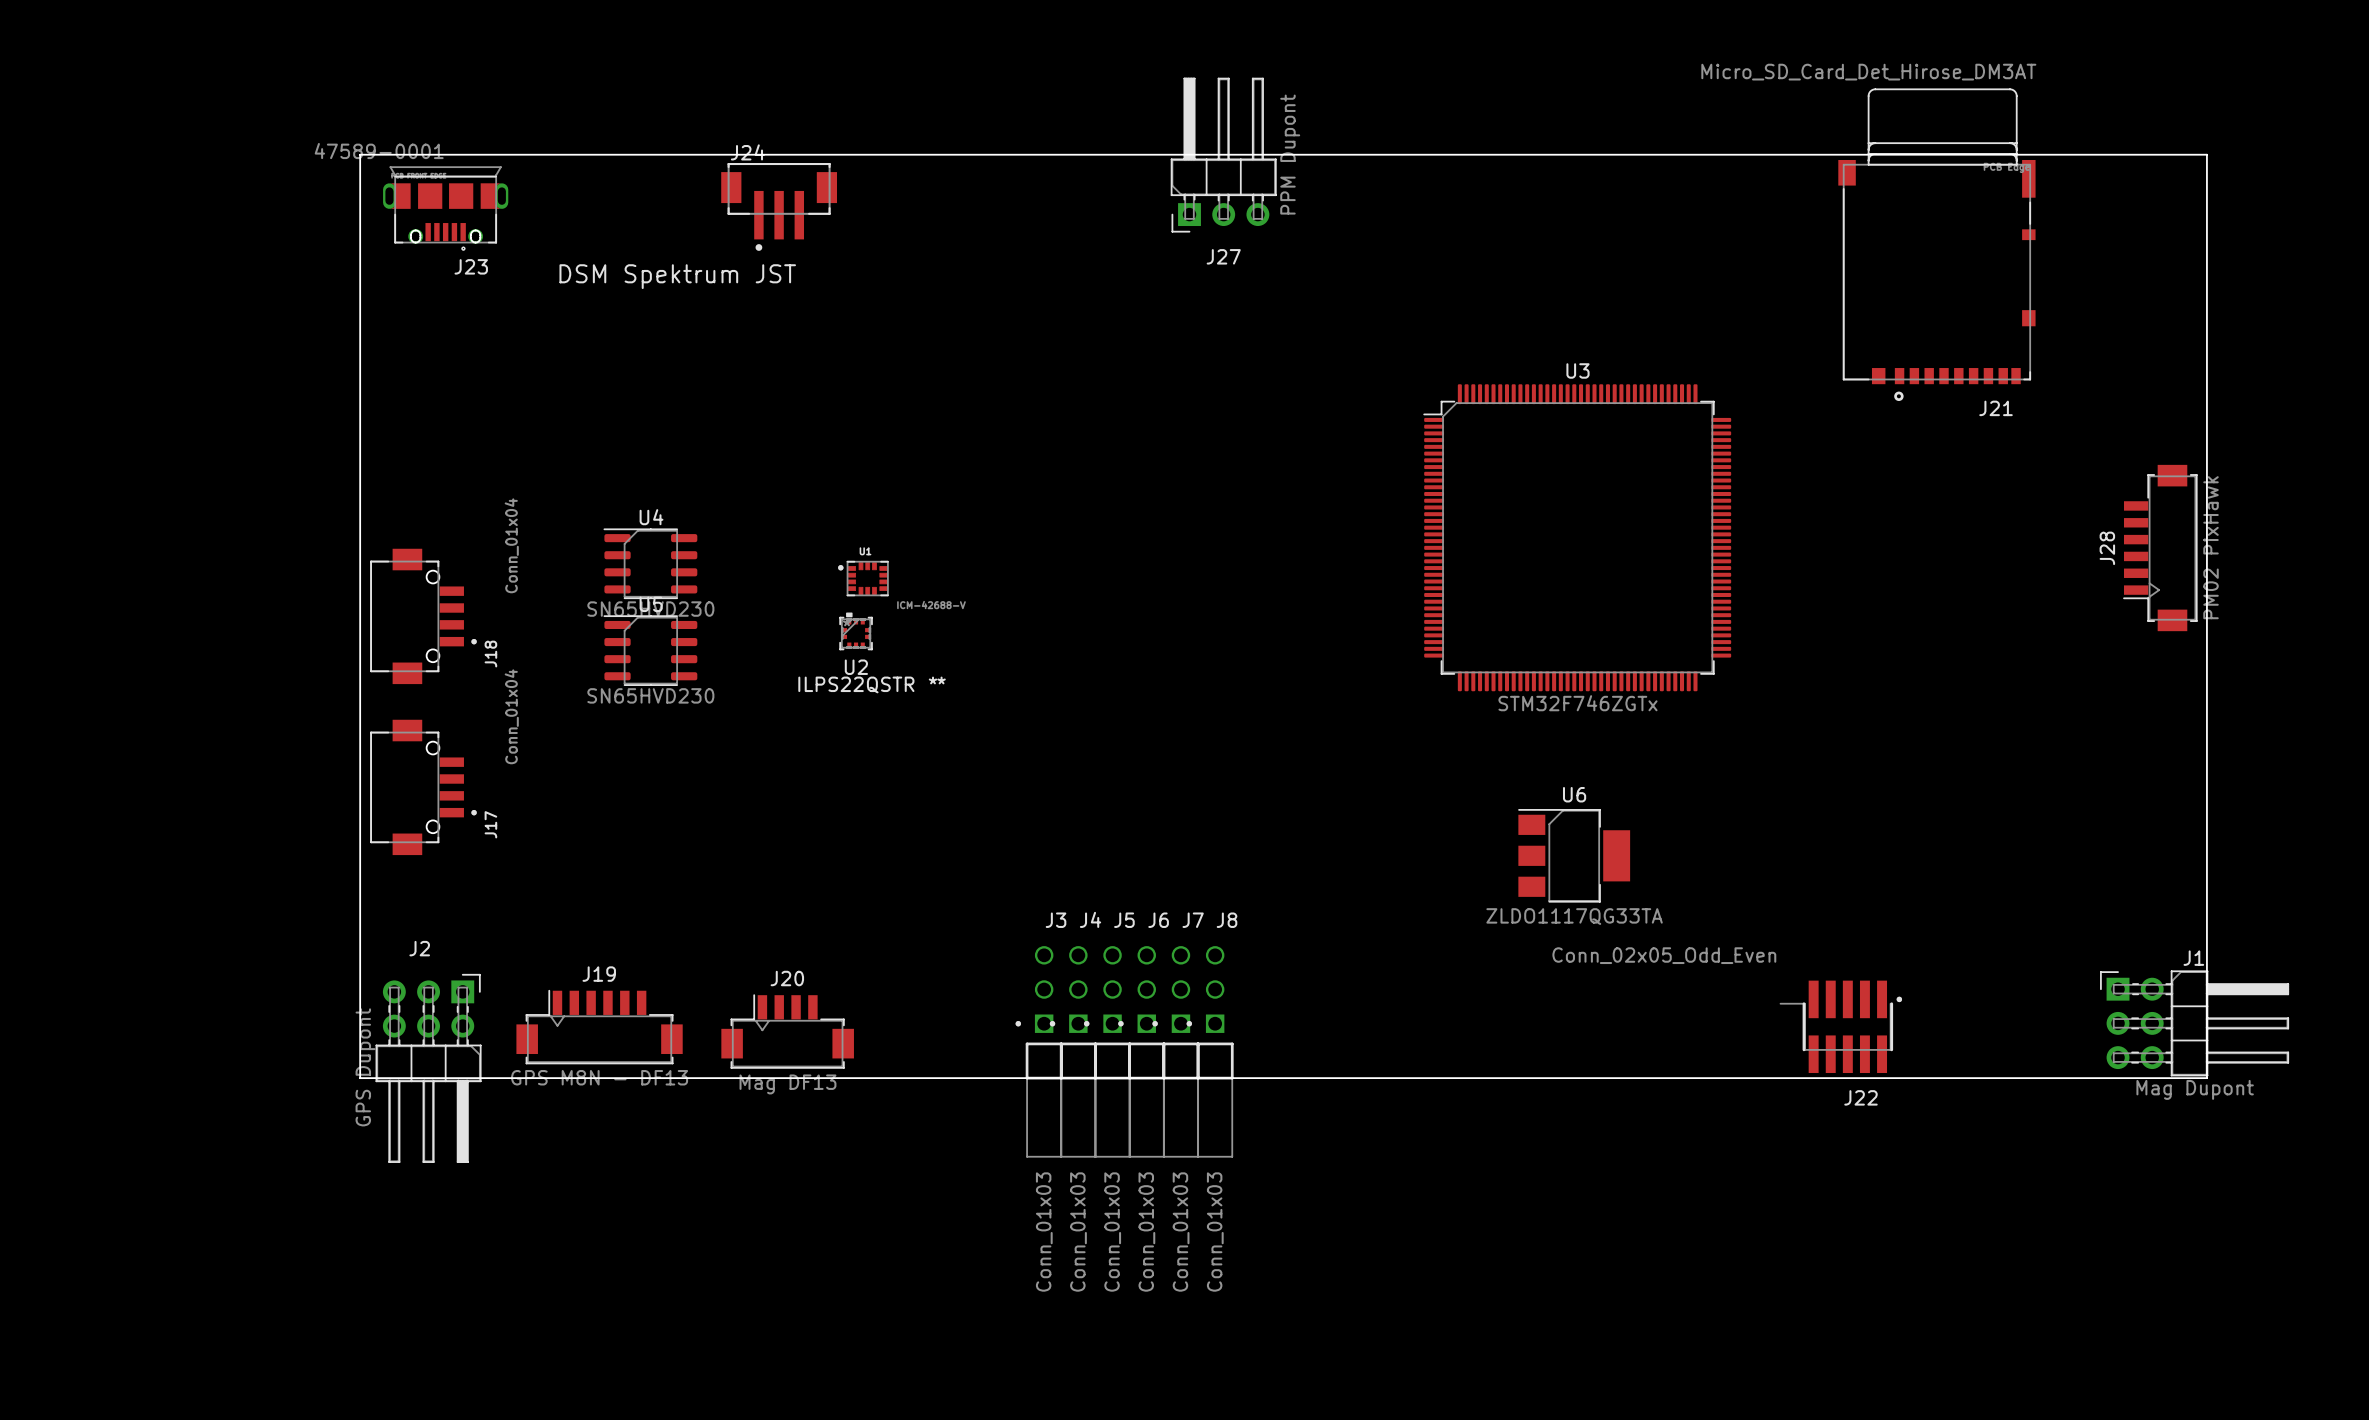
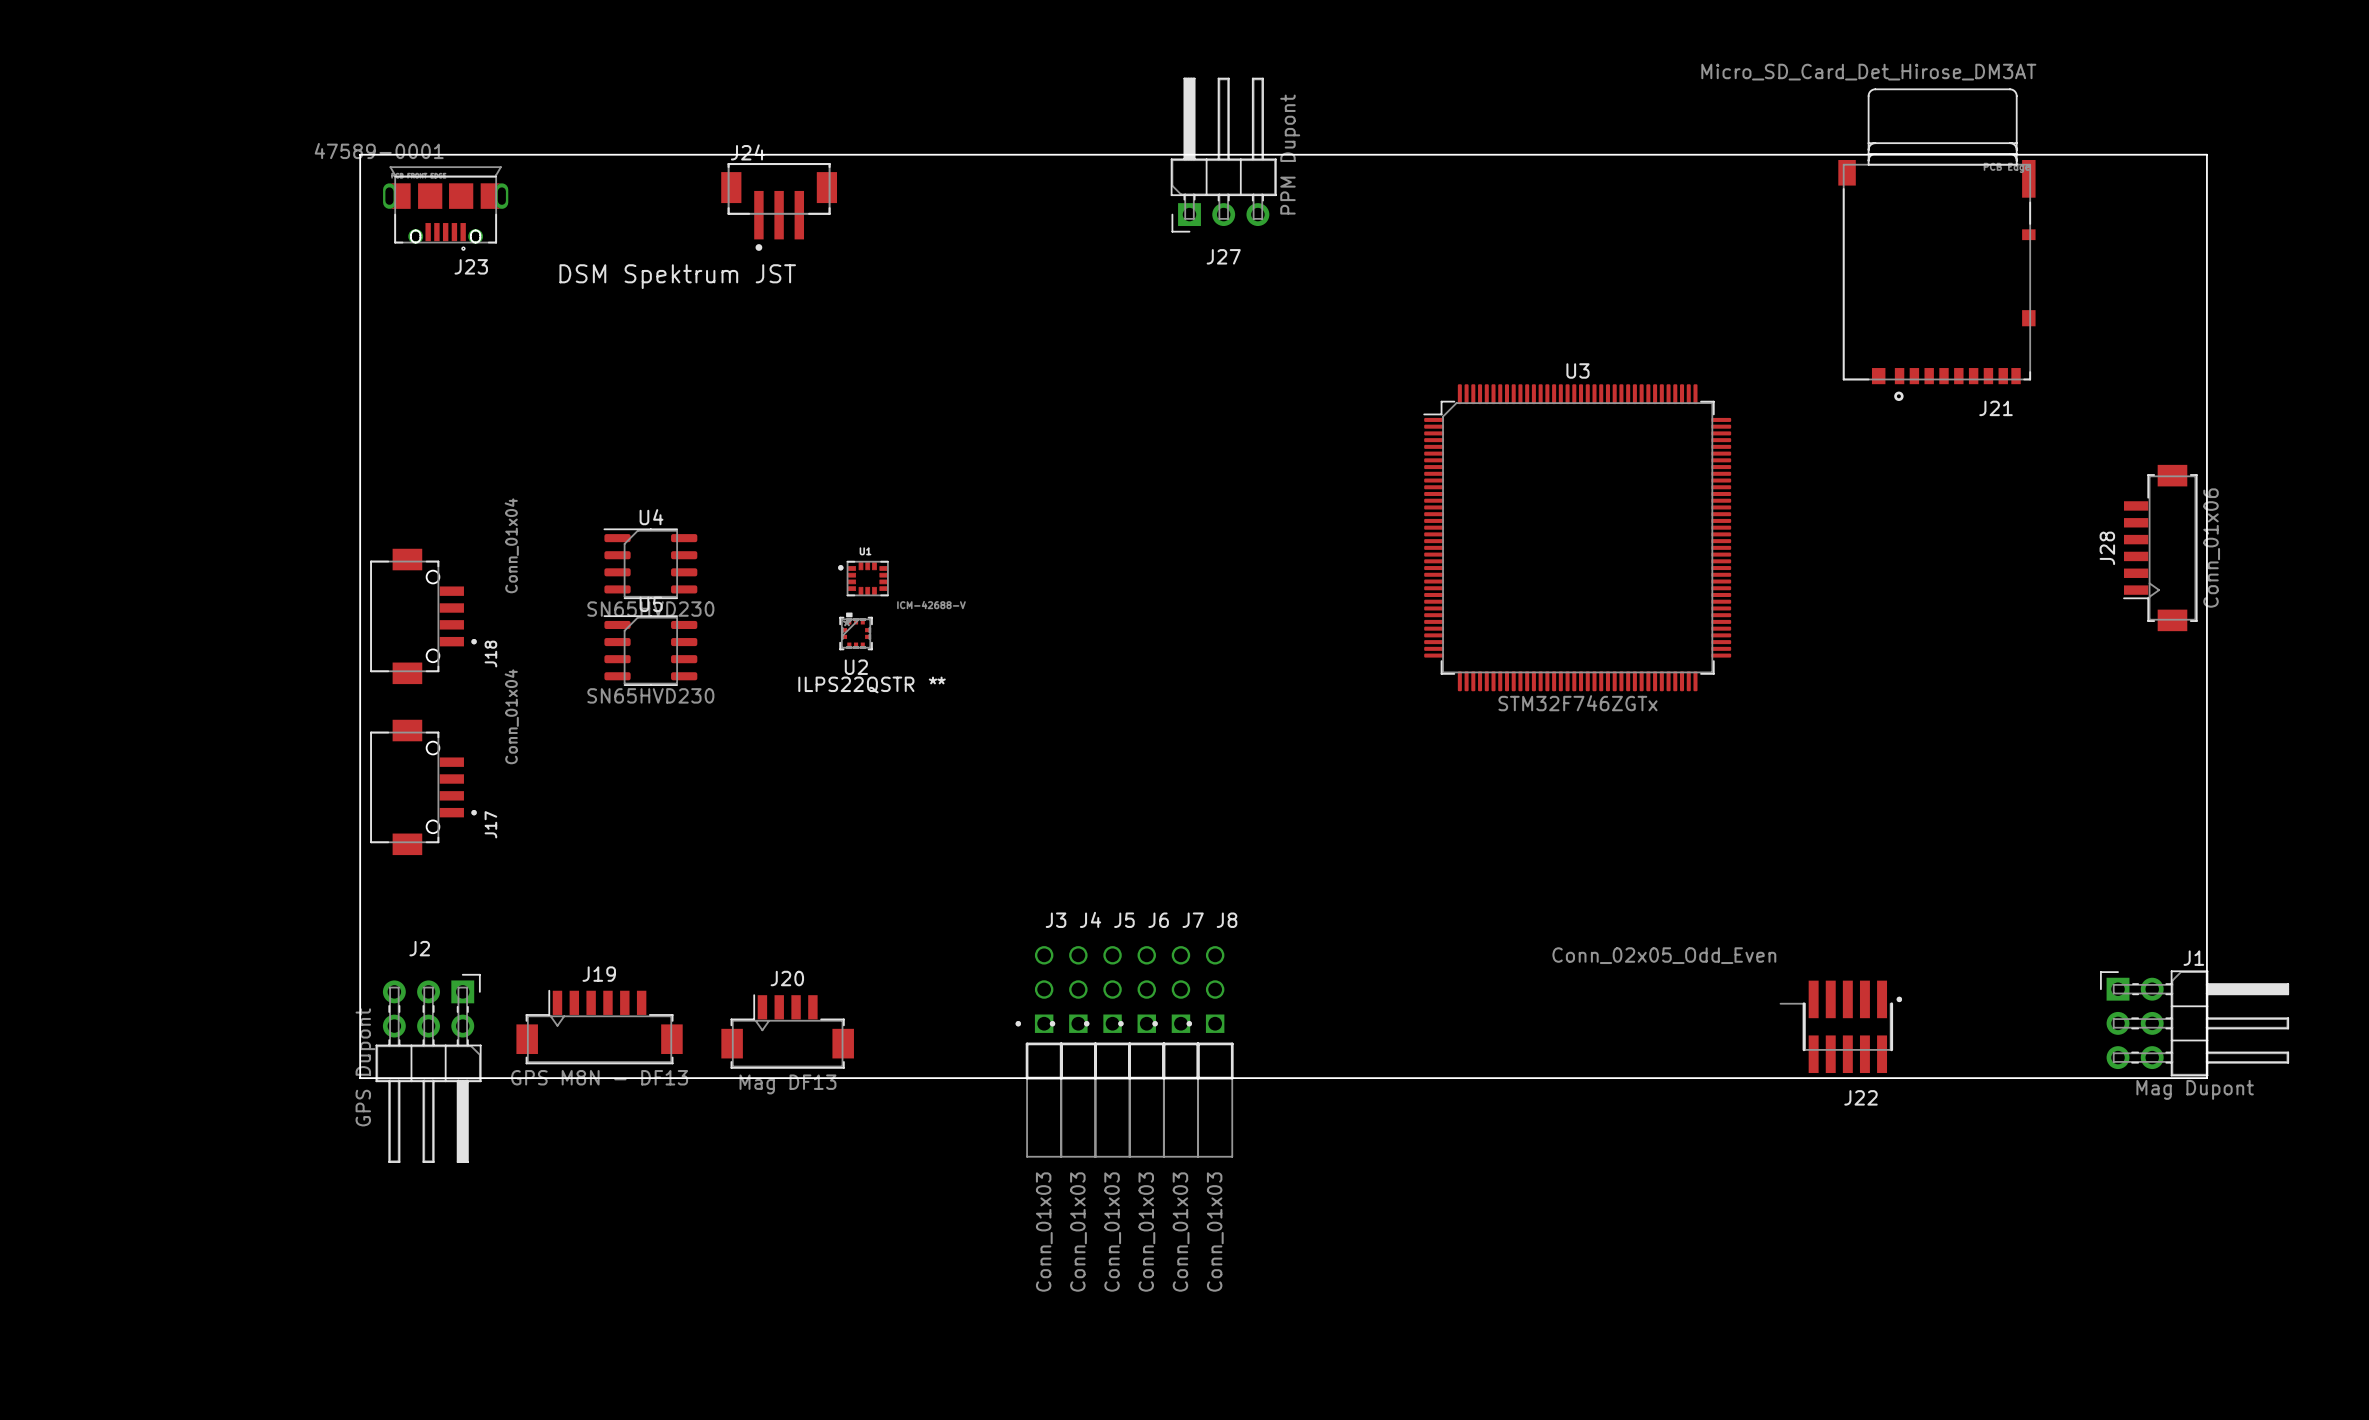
J28 value: PM02 PixHawk (2211, 547) -> Conn_01x06 (2211, 548)
U6: ZLDO1117QG33TA (1574, 855) -> none

